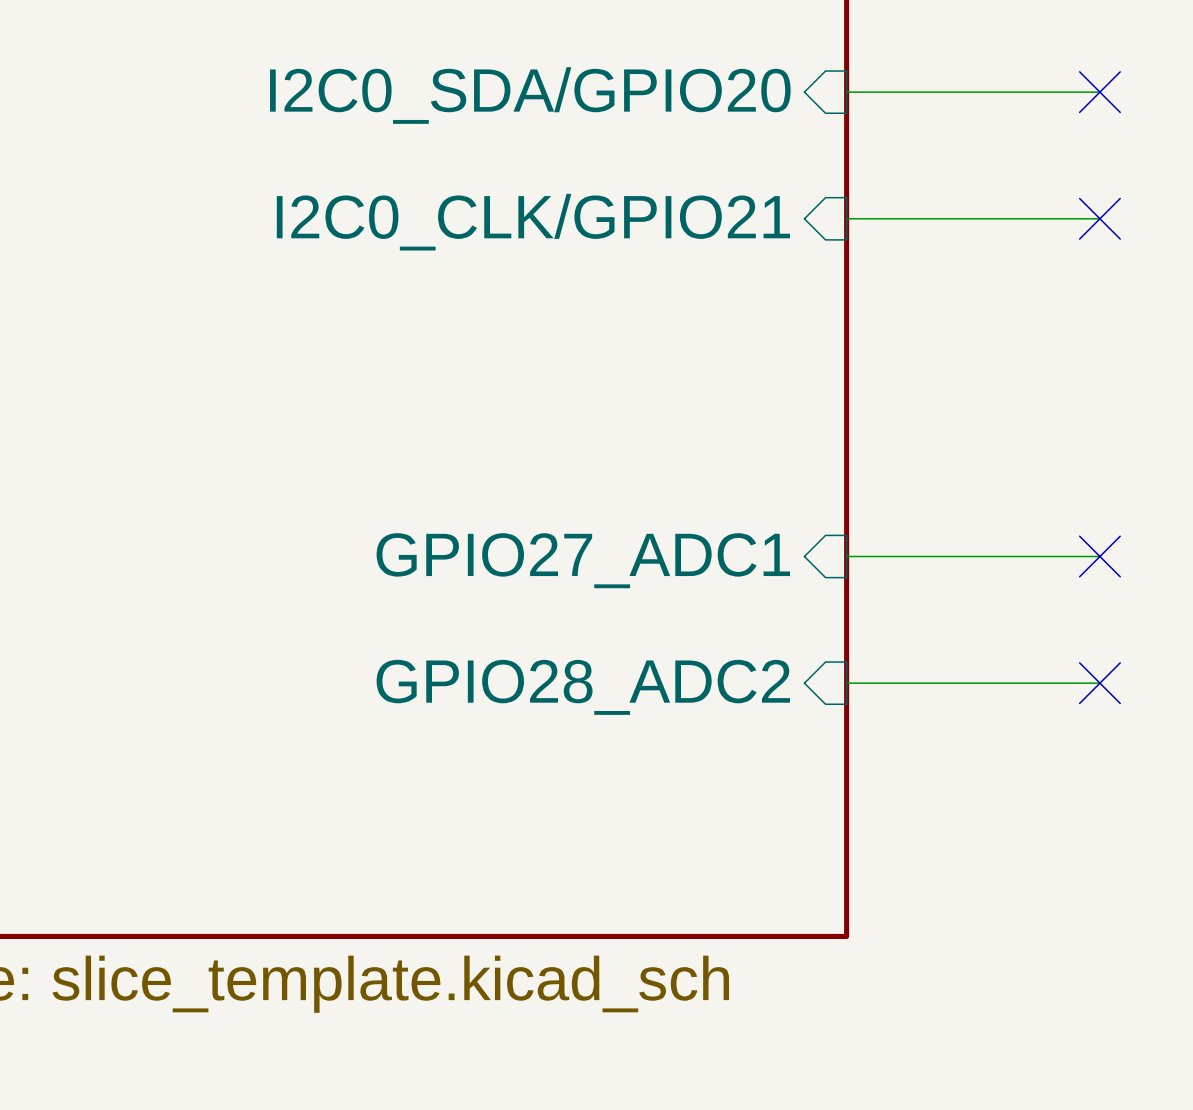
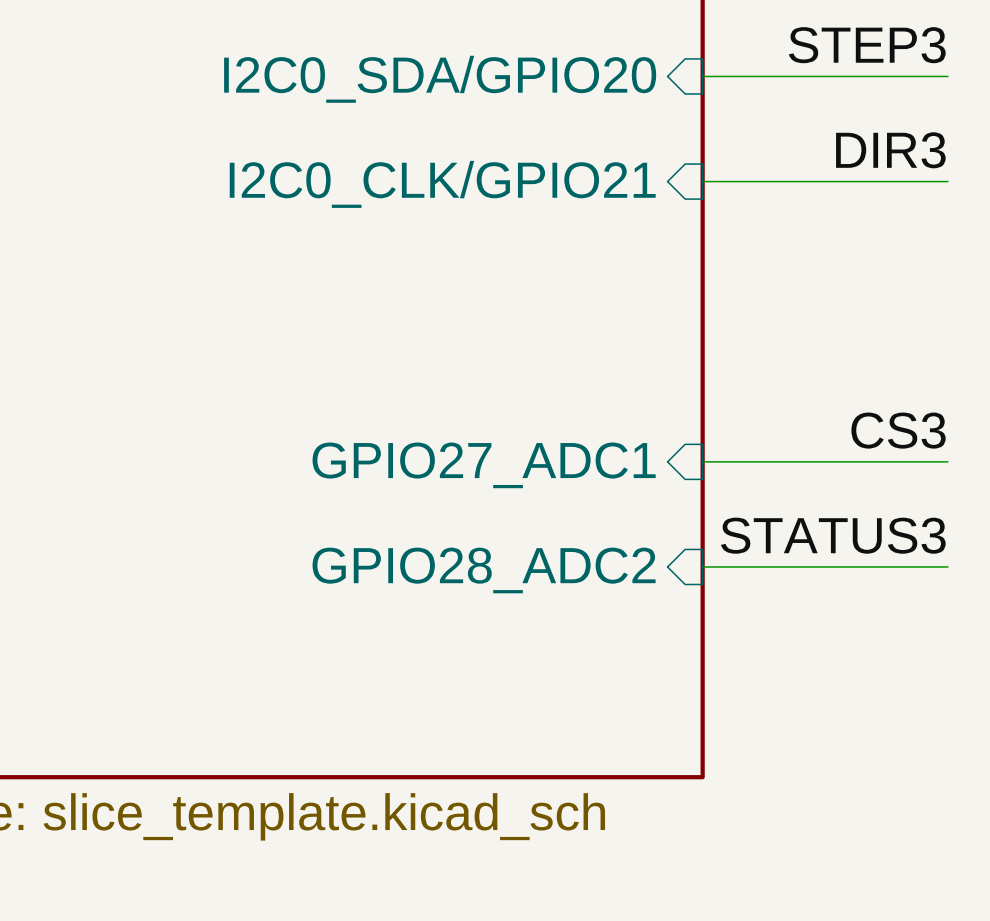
label: none -> STEP3 (867, 45)
wire: none -> (912, 76) (947, 76)
no-connect mark: (1099, 92) -> none
label: none -> DIR3 (890, 150)
wire: none -> (912, 181) (947, 181)
no-connect mark: (1099, 218) -> none
label: none -> CS3 (898, 430)
wire: none -> (912, 461) (947, 461)
no-connect mark: (1099, 556) -> none
label: none -> STATUS3 (833, 535)
wire: none -> (912, 566) (947, 566)
no-connect mark: (1099, 683) -> none

